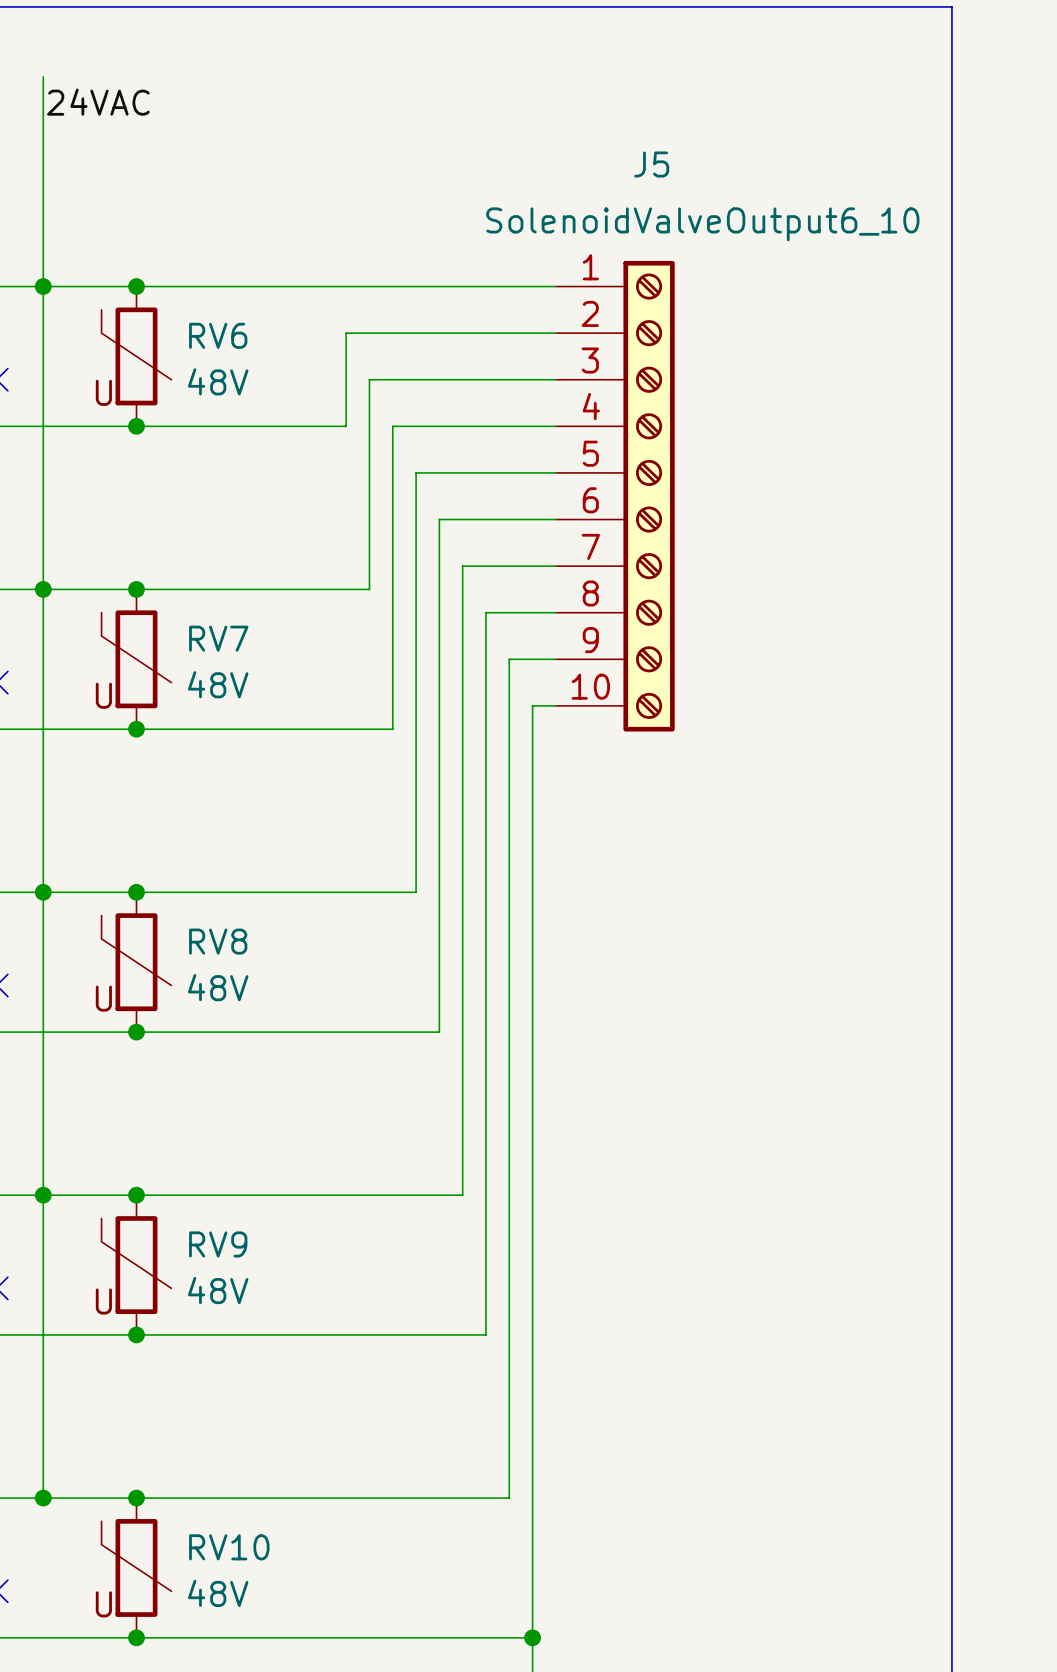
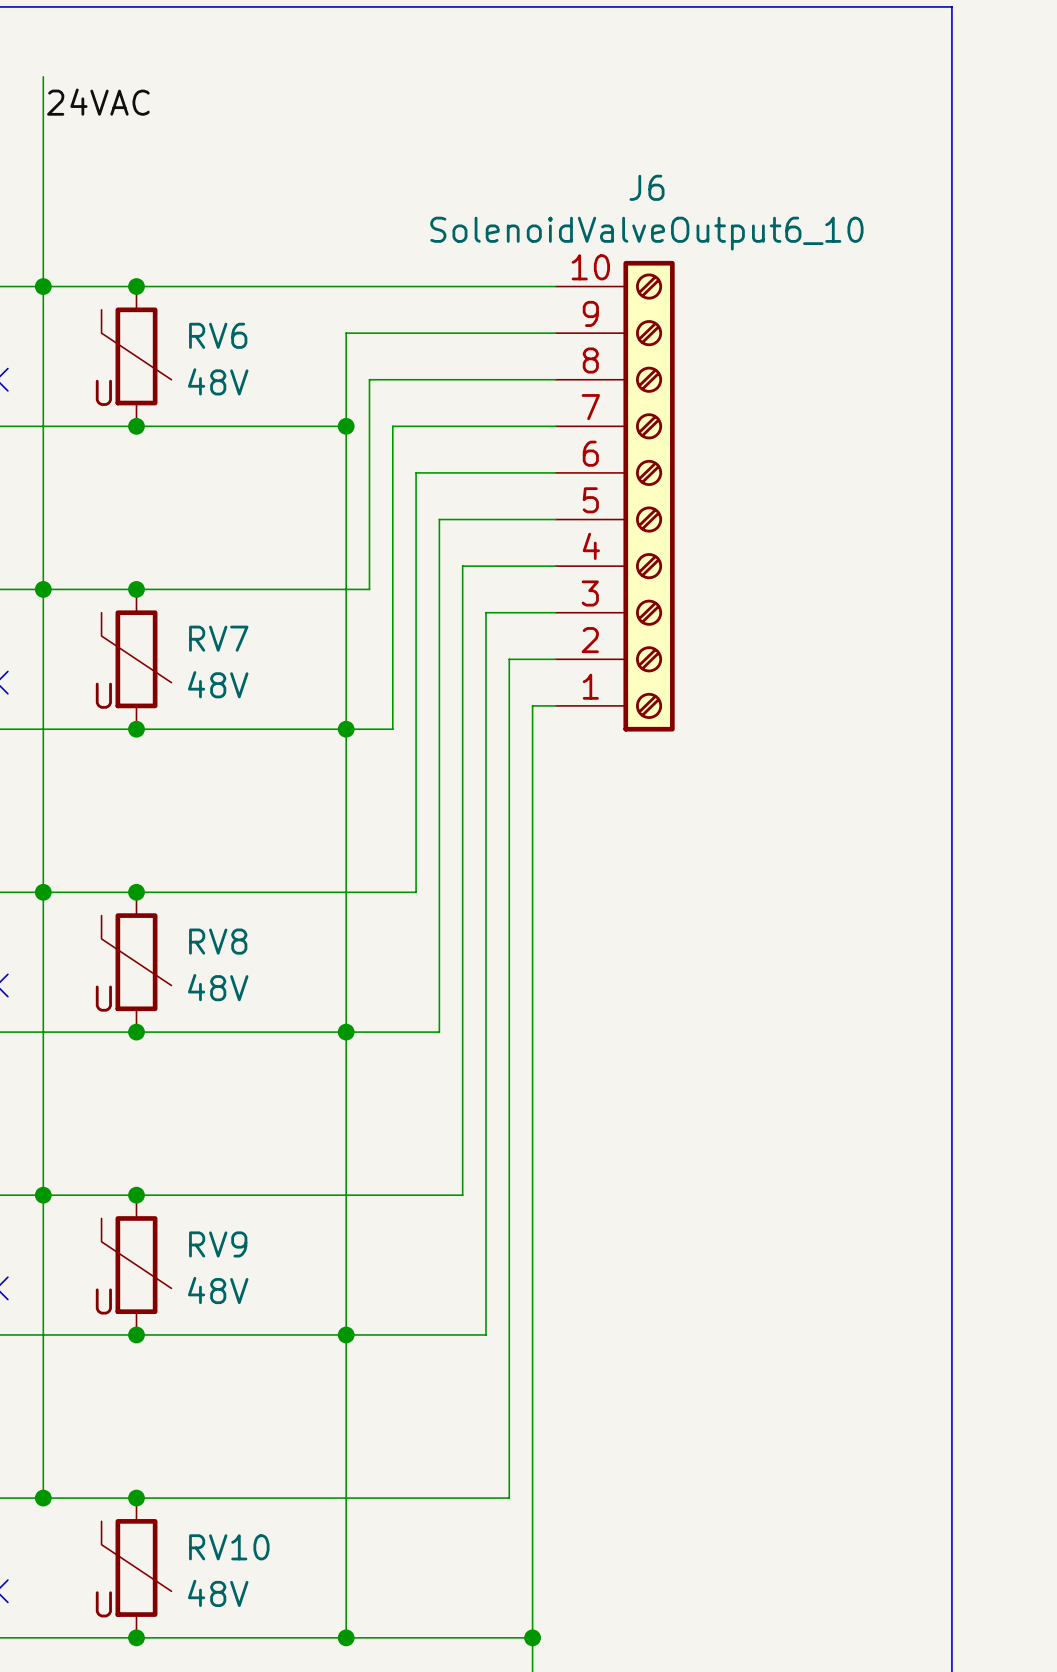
wire: none -> (346, 426) (346, 1637)
junction: none -> (346, 426)
J5: SolenoidValveOutput6_10 (615, 496) -> none
J6: none -> SolenoidValveOutput6_10 (615, 496)
junction: none -> (346, 729)
junction: none -> (346, 1032)
junction: none -> (346, 1334)
junction: none -> (346, 1637)

